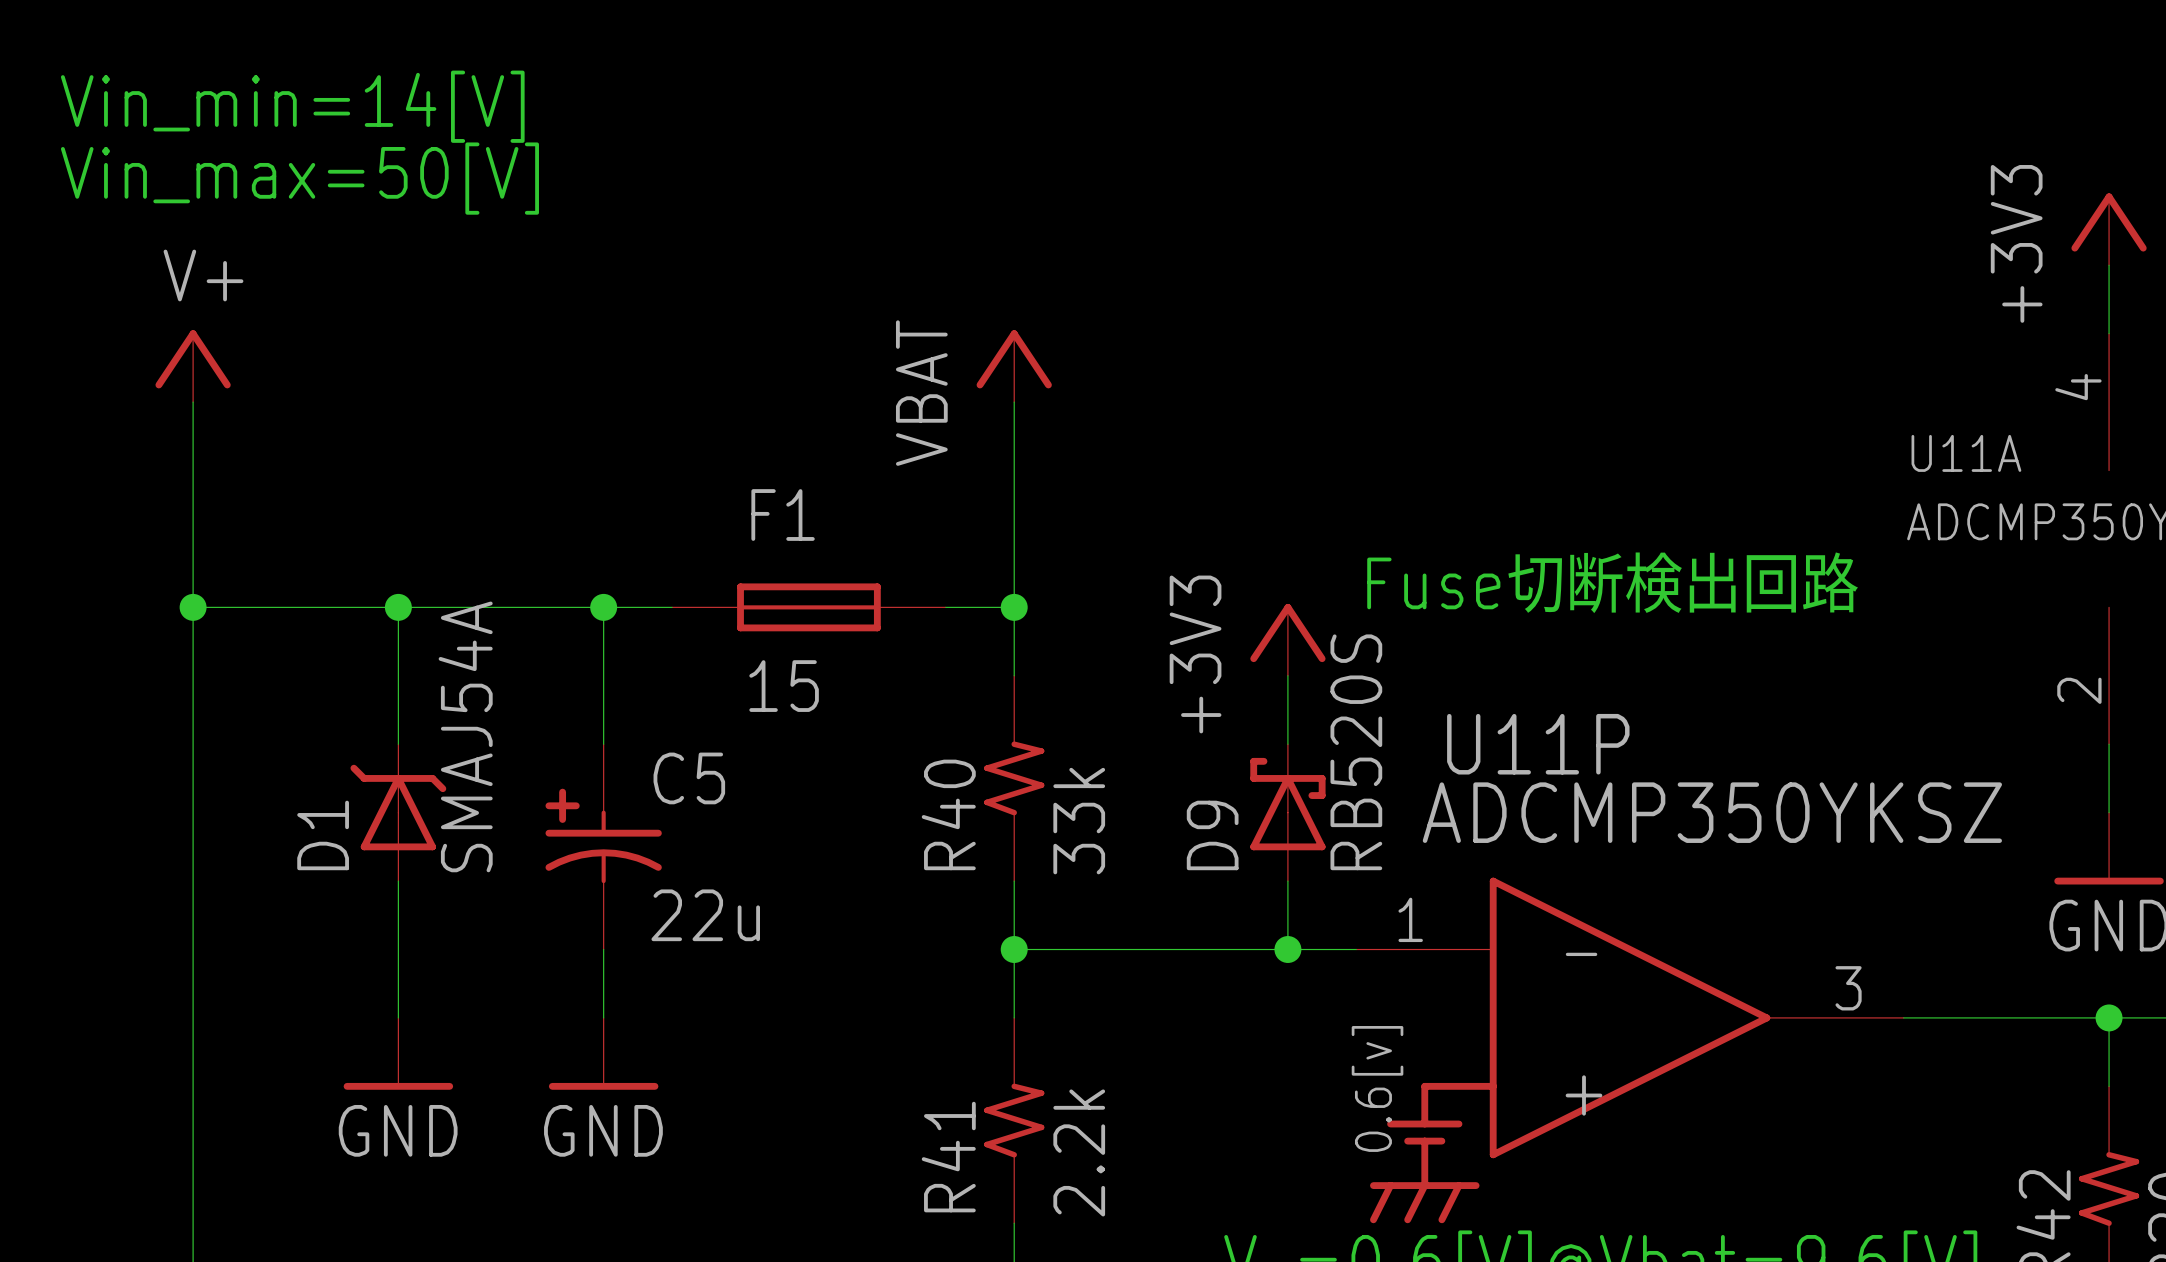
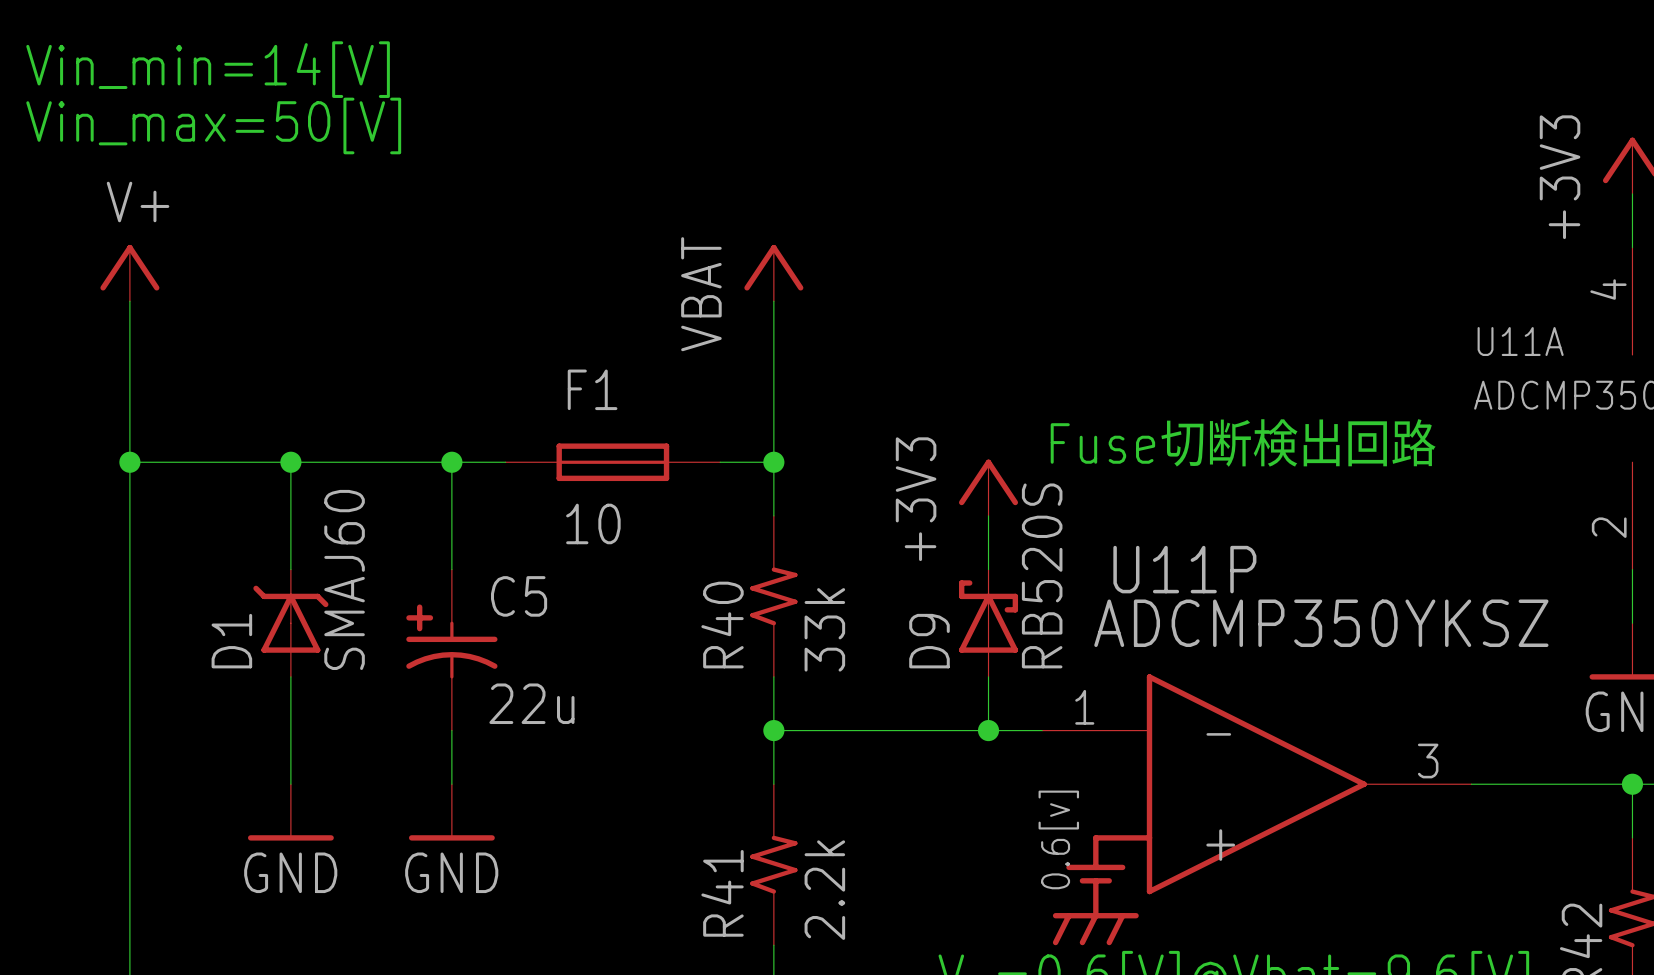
F1 value: 15 (784, 686) -> 10 (593, 523)
D1 value: SMAJ54A (465, 736) -> SMAJ60 (344, 579)

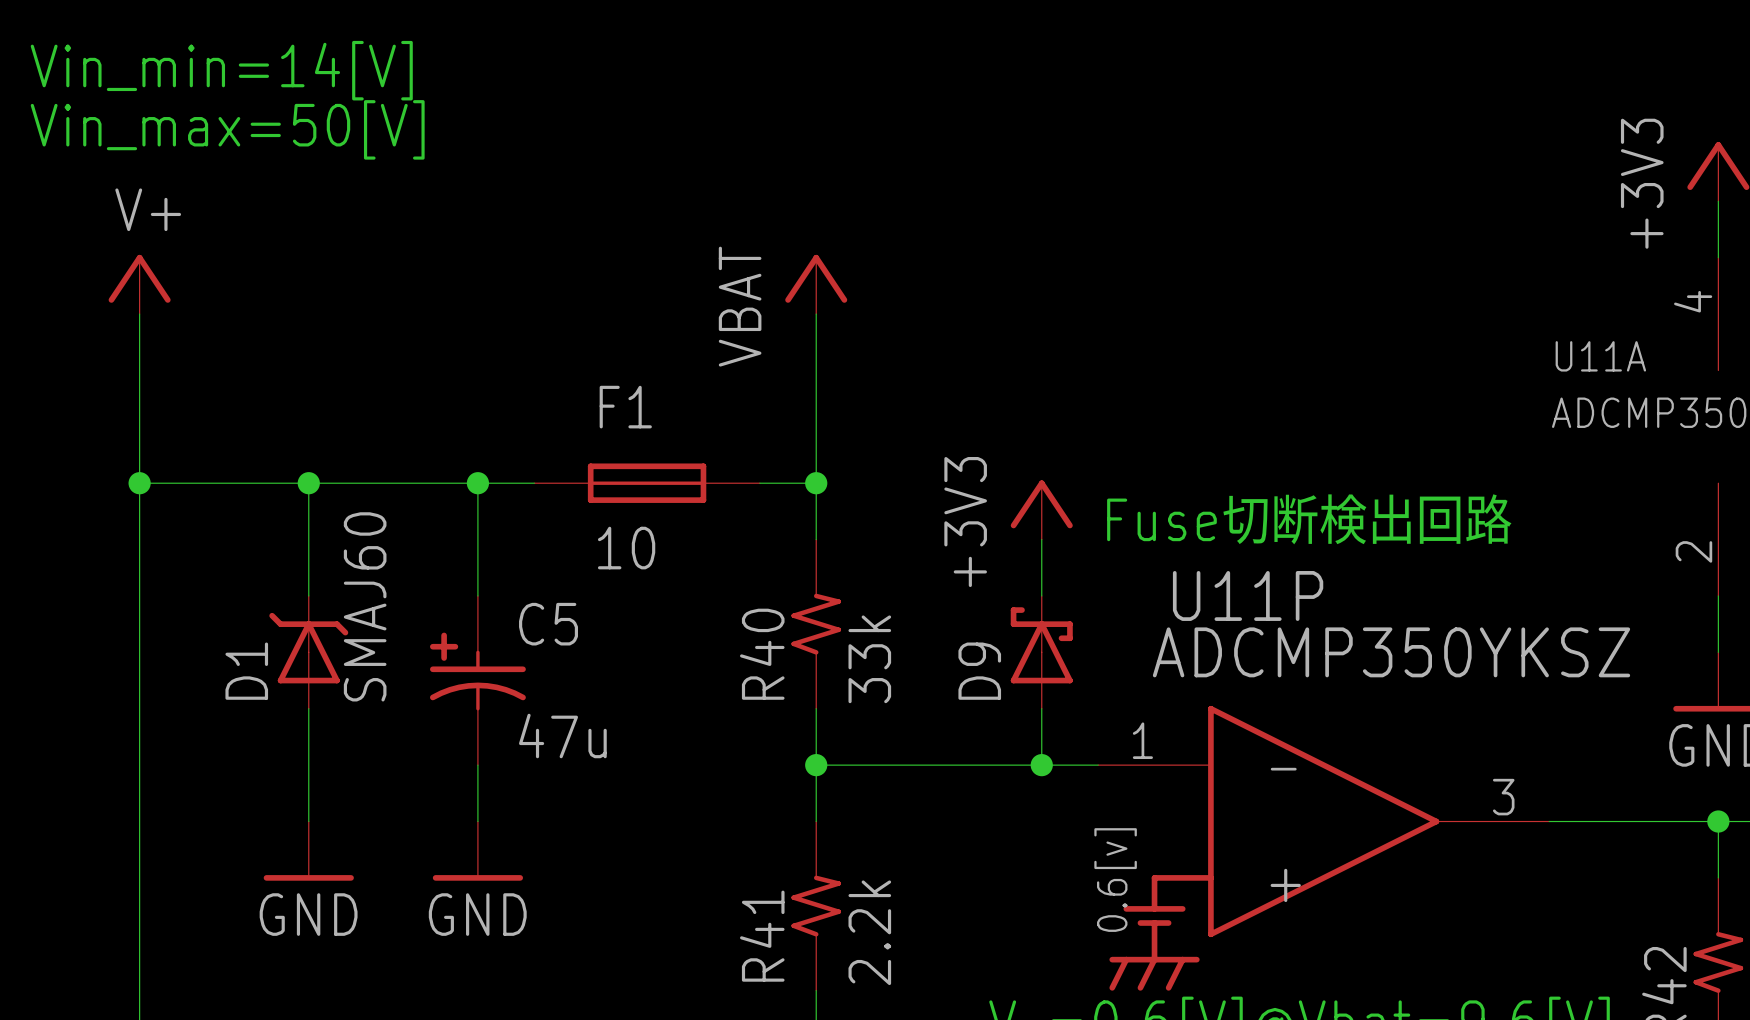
text position: Fuse切断検出回路 (1243, 442) -> Fuse切断検出回路 (1310, 519)
D9 value: RB520S (1042, 575) -> none
C5 value: 22u (531, 703) -> 47u (562, 736)

